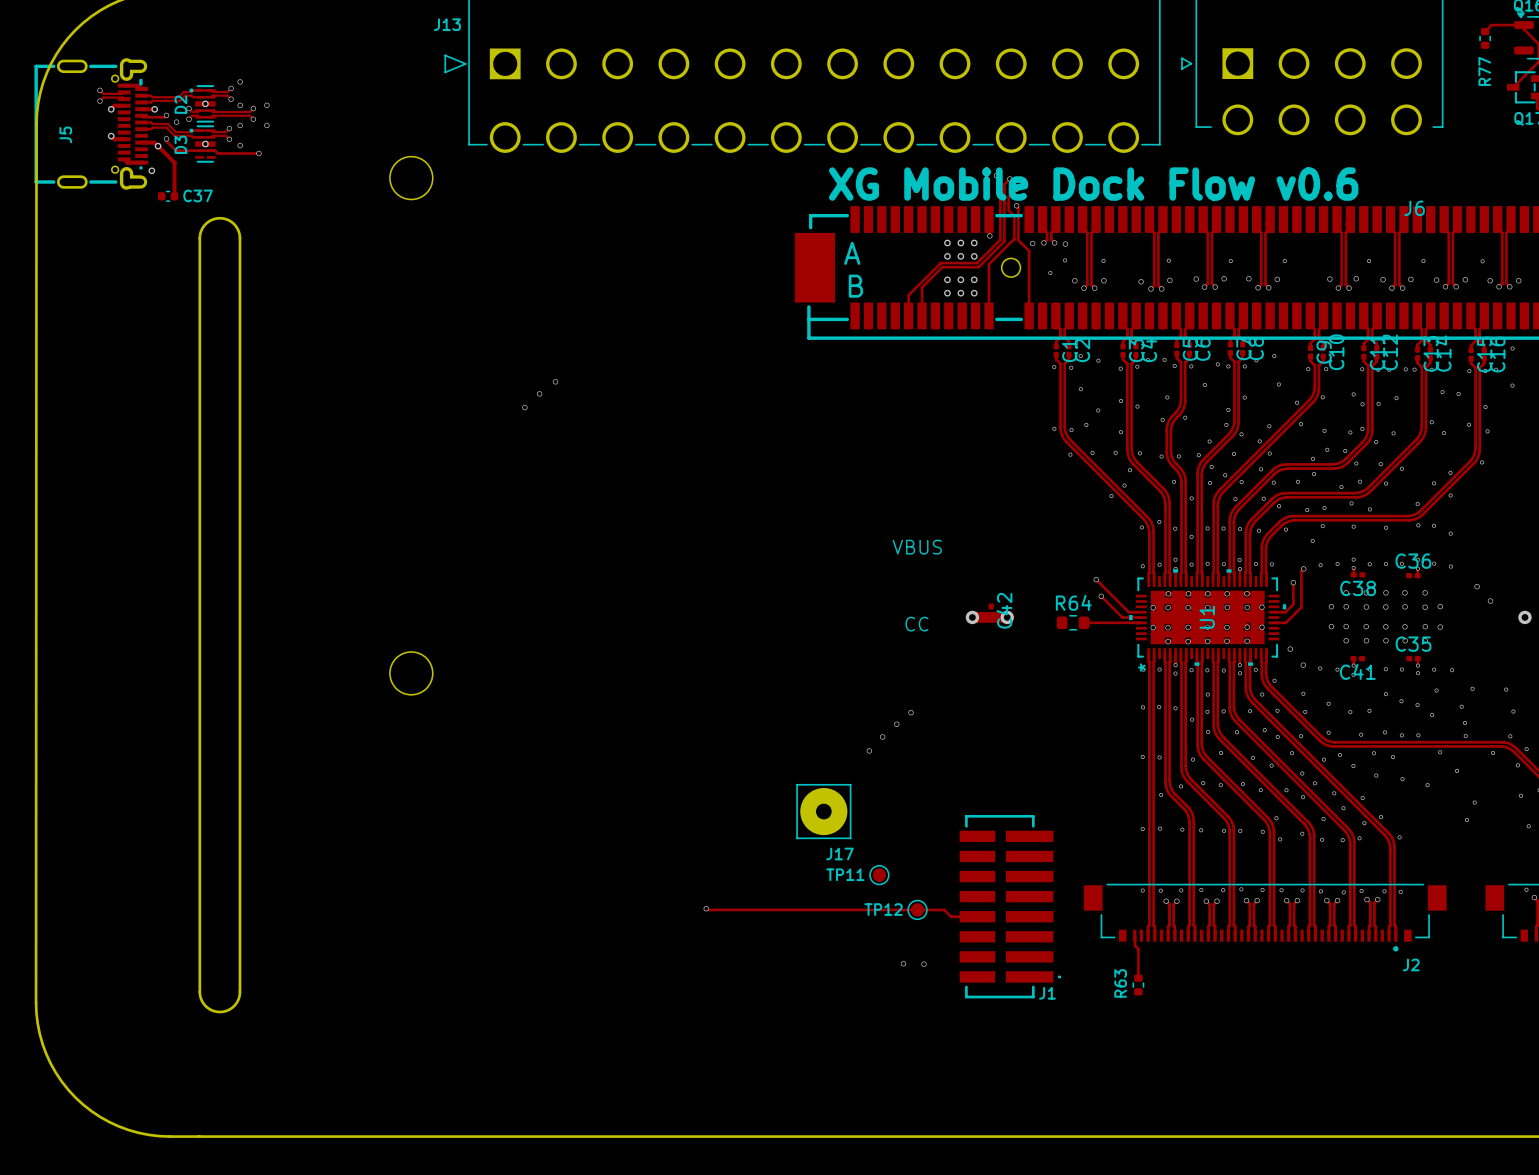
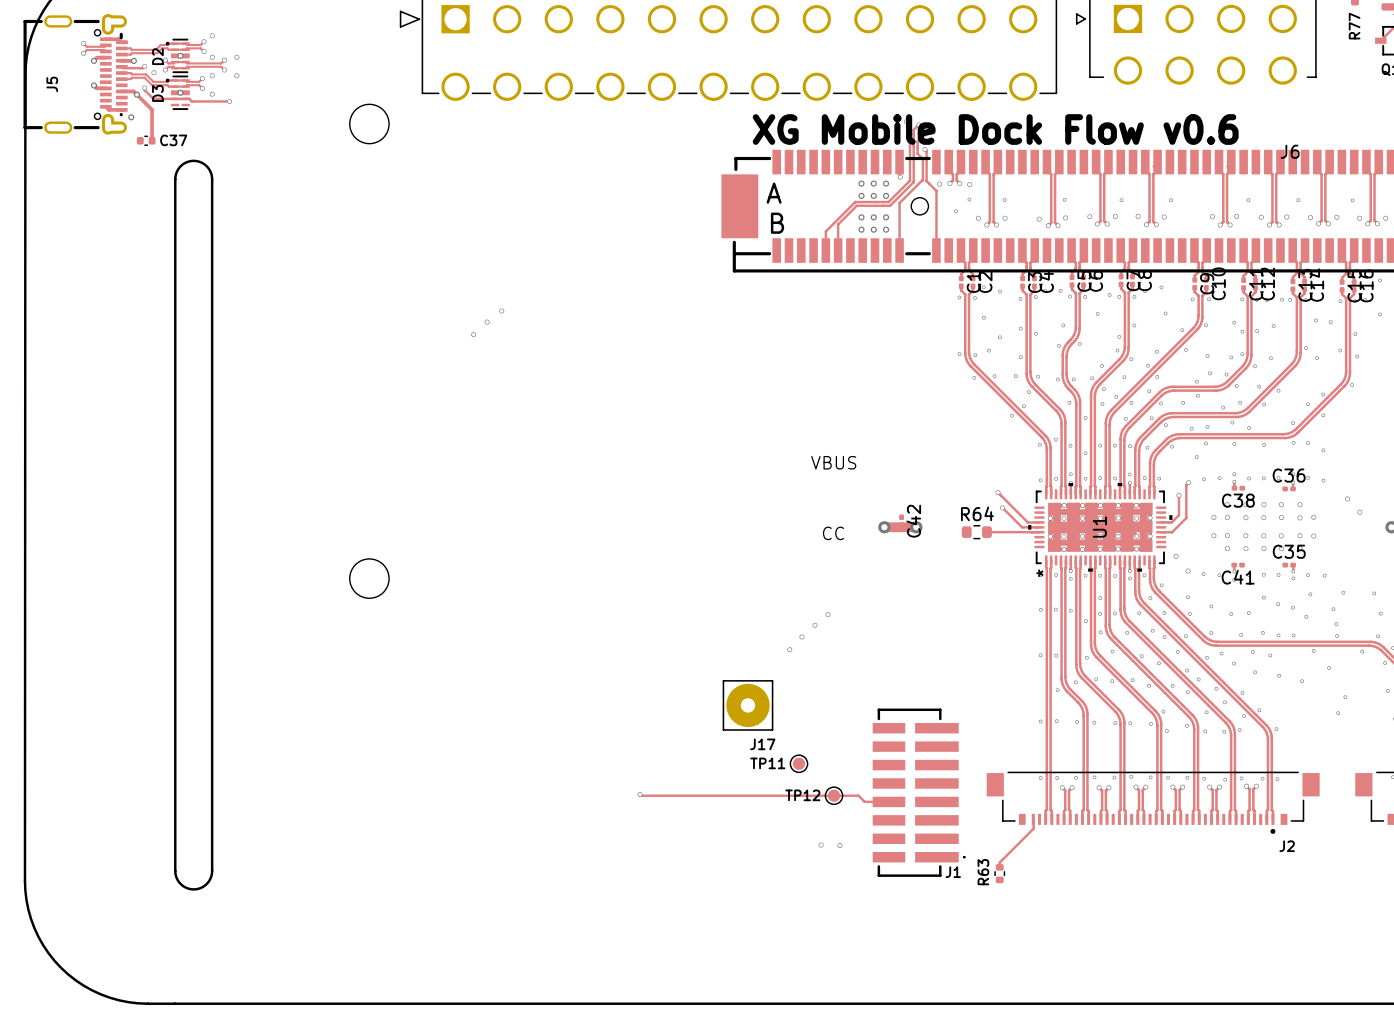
track: (1135, 945) (1138, 949) (1138, 978) -> (1033, 828) (999, 862) (999, 867)
R63 position: (1138, 985) -> (999, 873)

